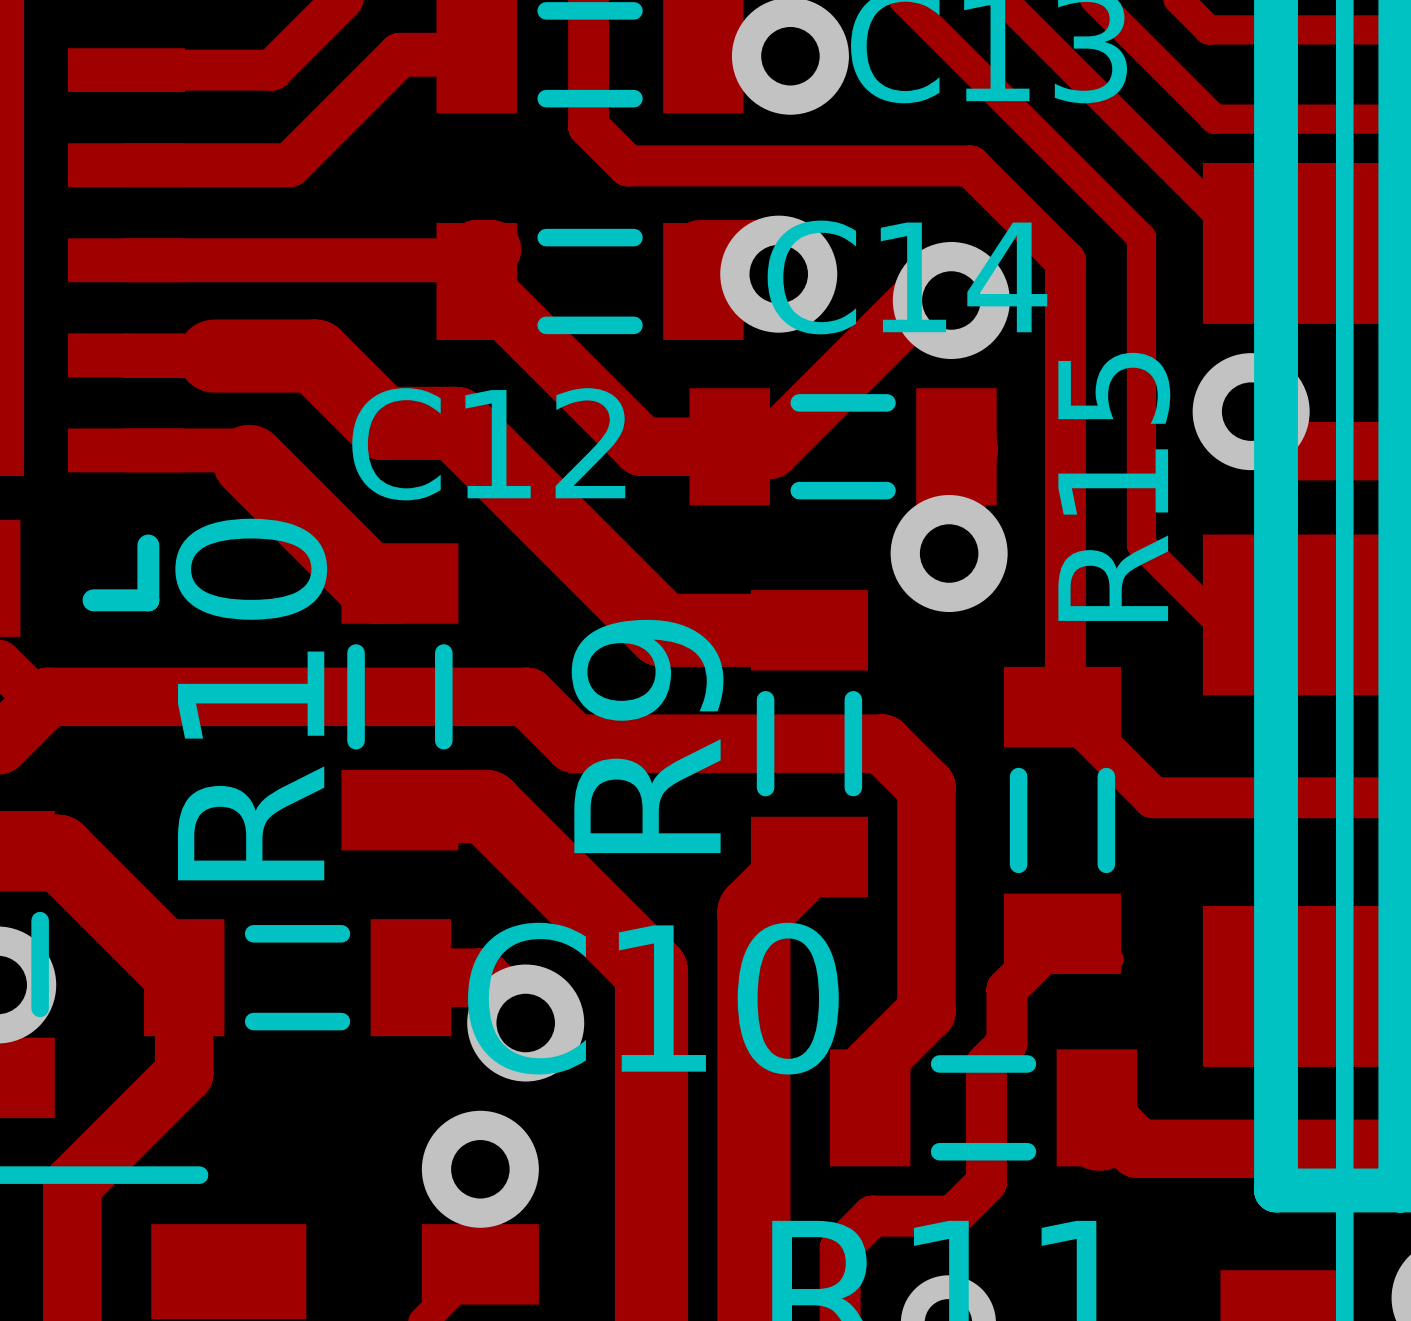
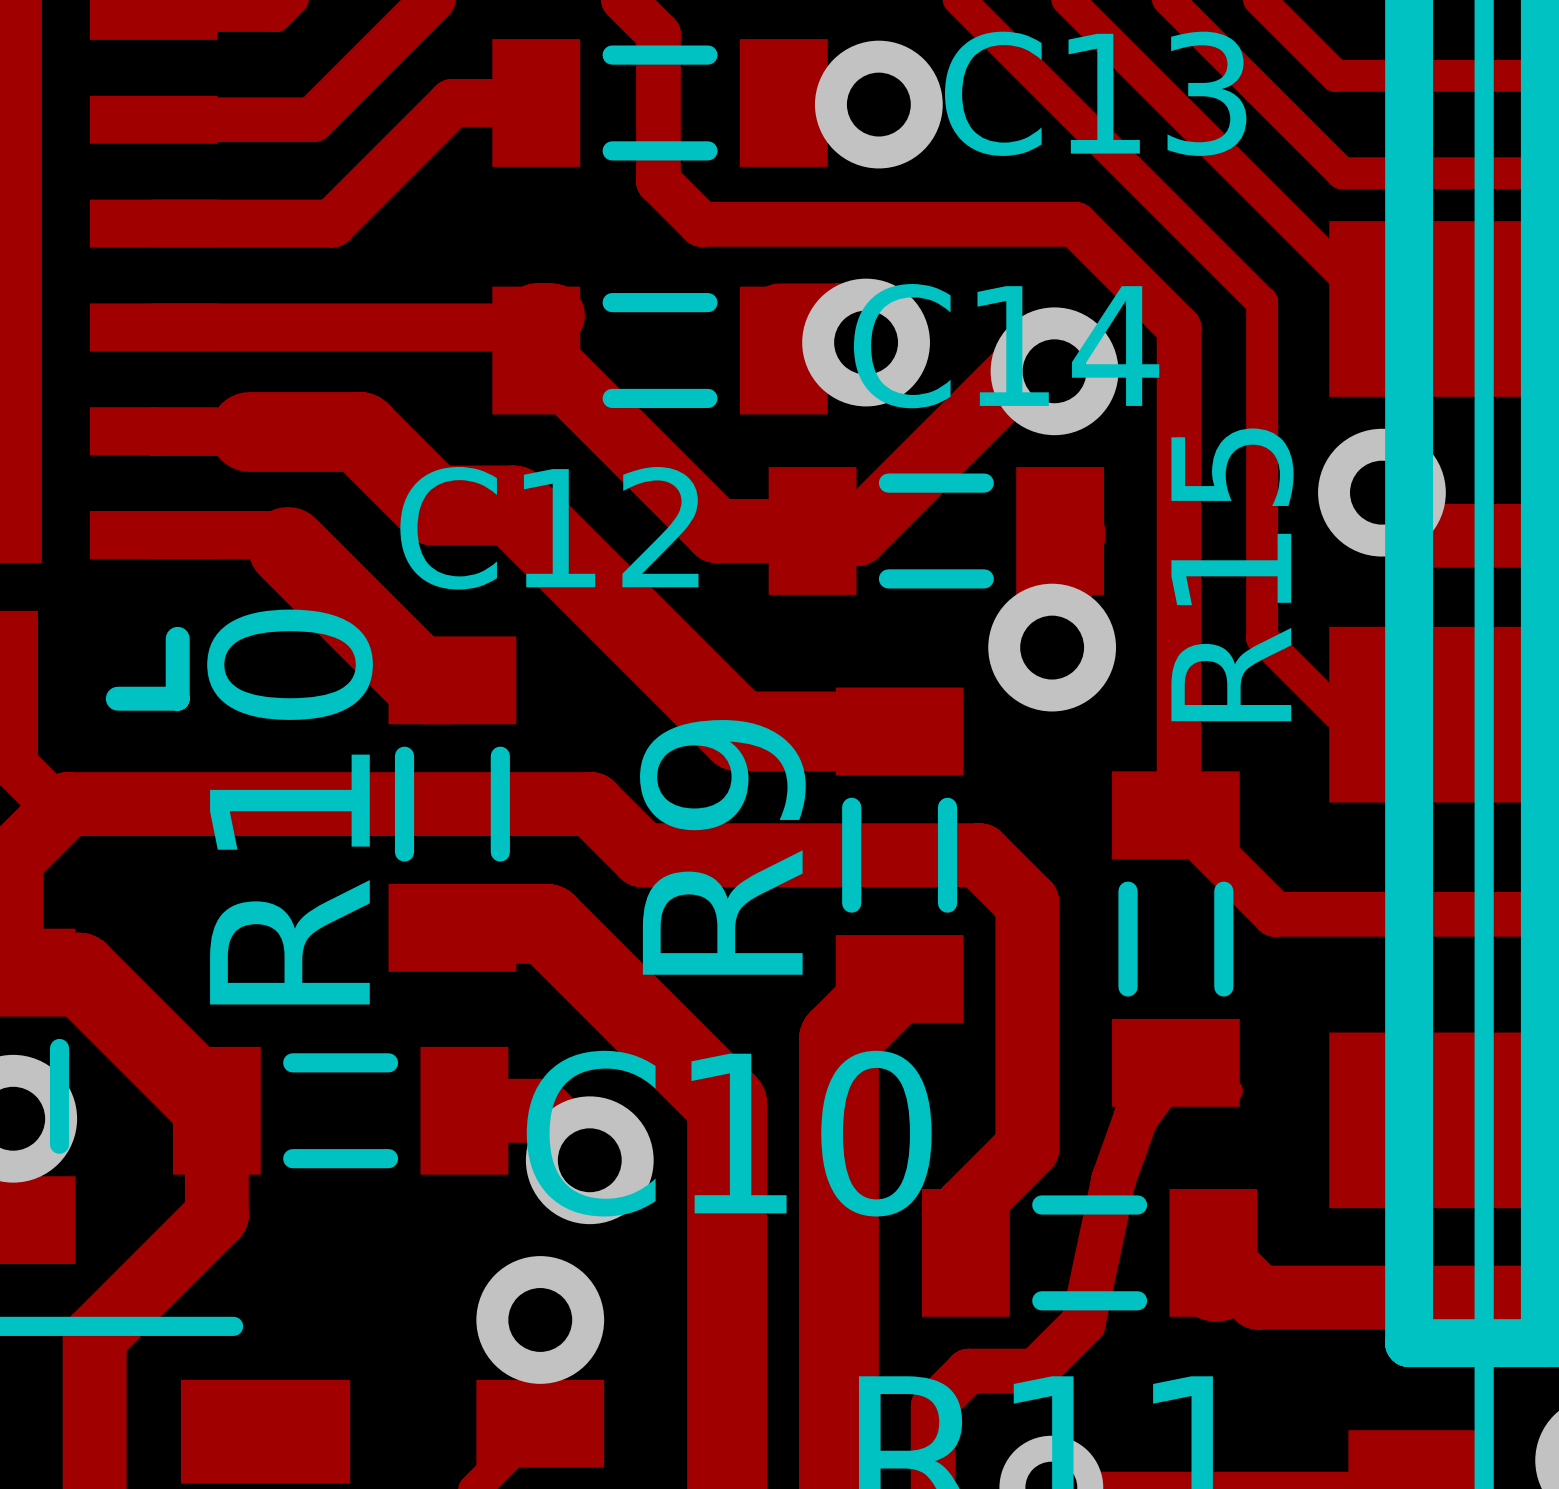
track: (1062, 933) (1006, 989) (1006, 1043) (986, 1063) (986, 1182) (952, 1216) (933, 1216) -> (1175, 1062) (1135, 1117) (1113, 1179) (1083, 1323) (1035, 1371)

